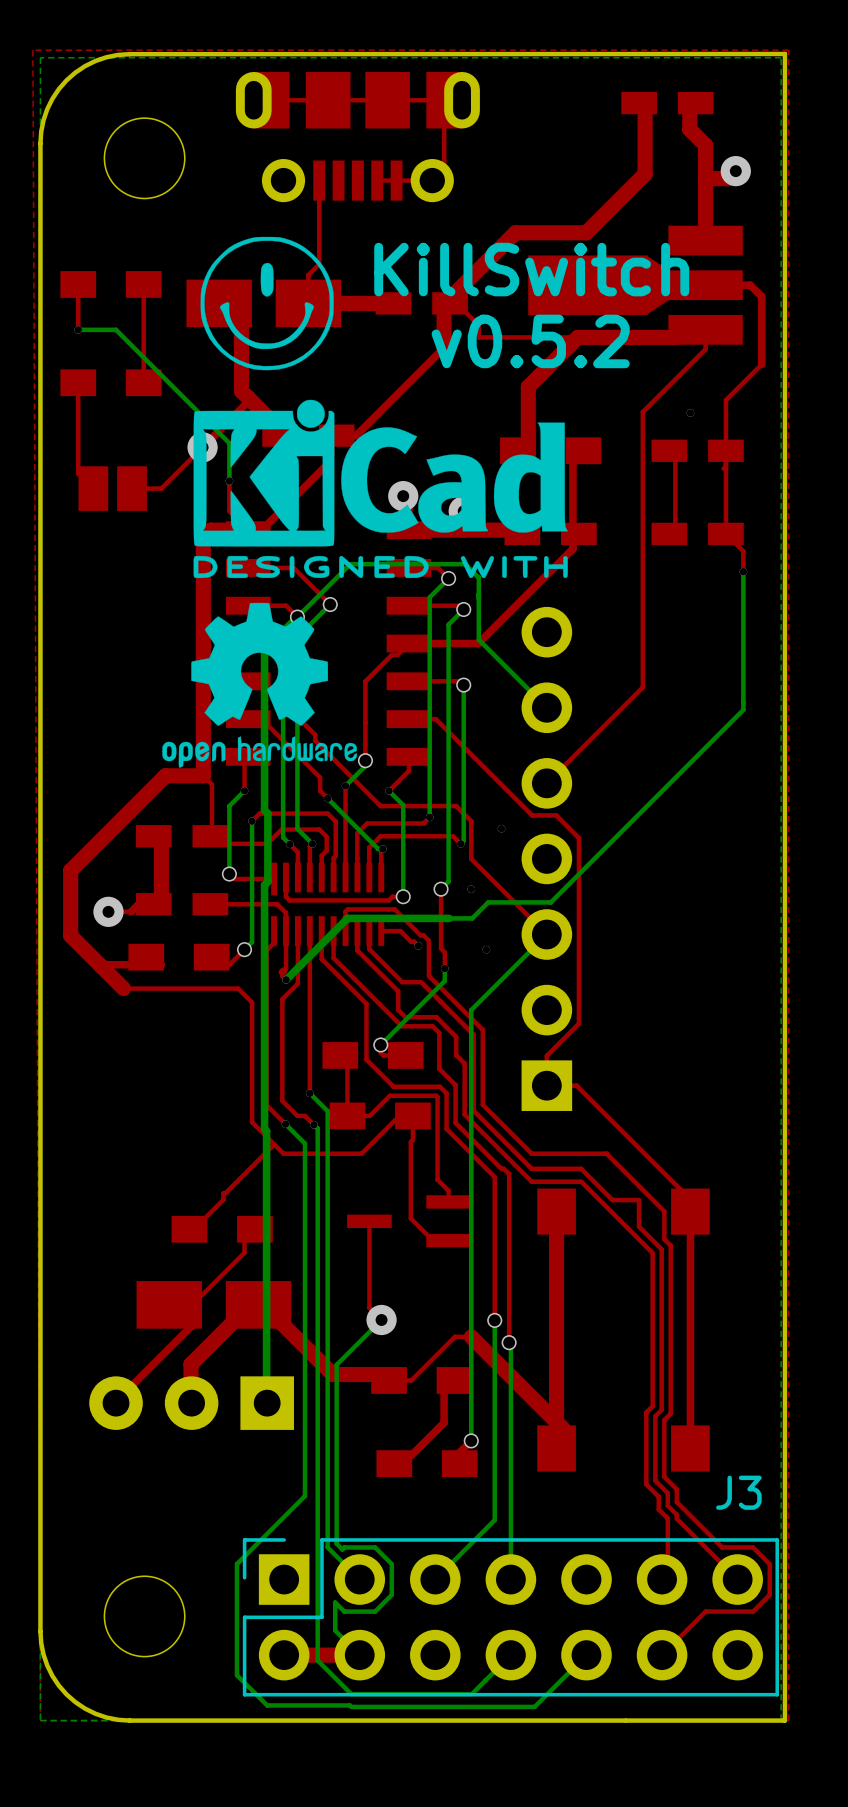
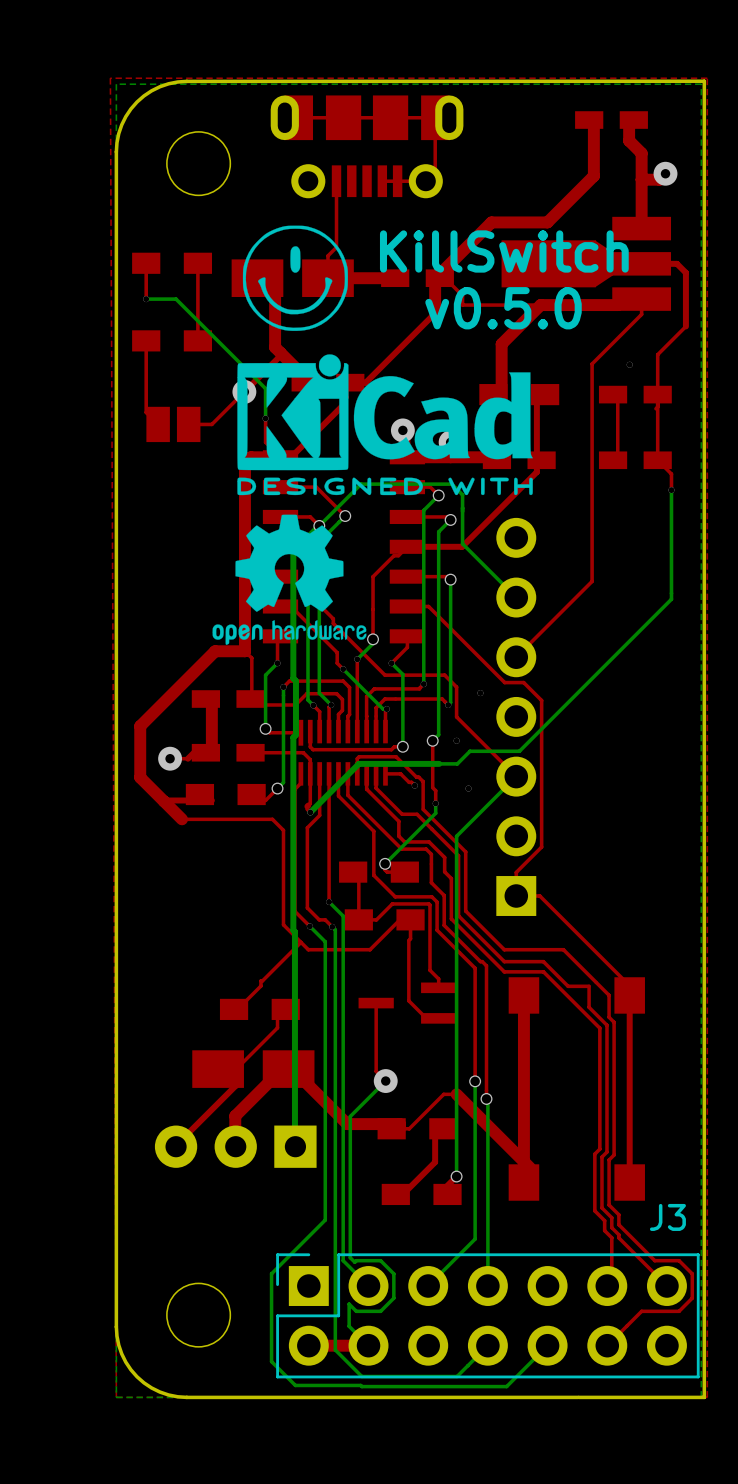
text: v0.5.2 (530, 341) -> v0.5.0 (503, 308)

